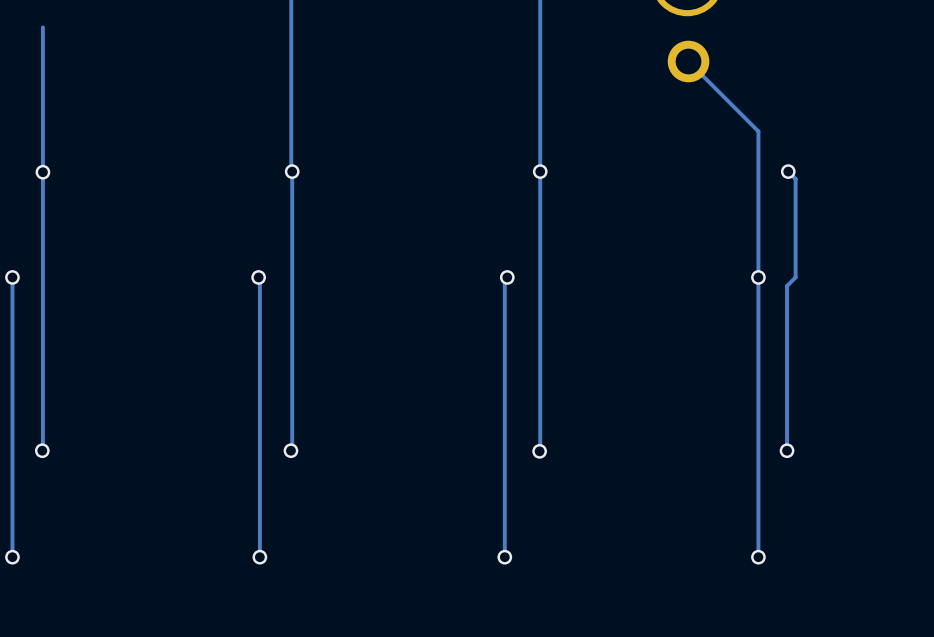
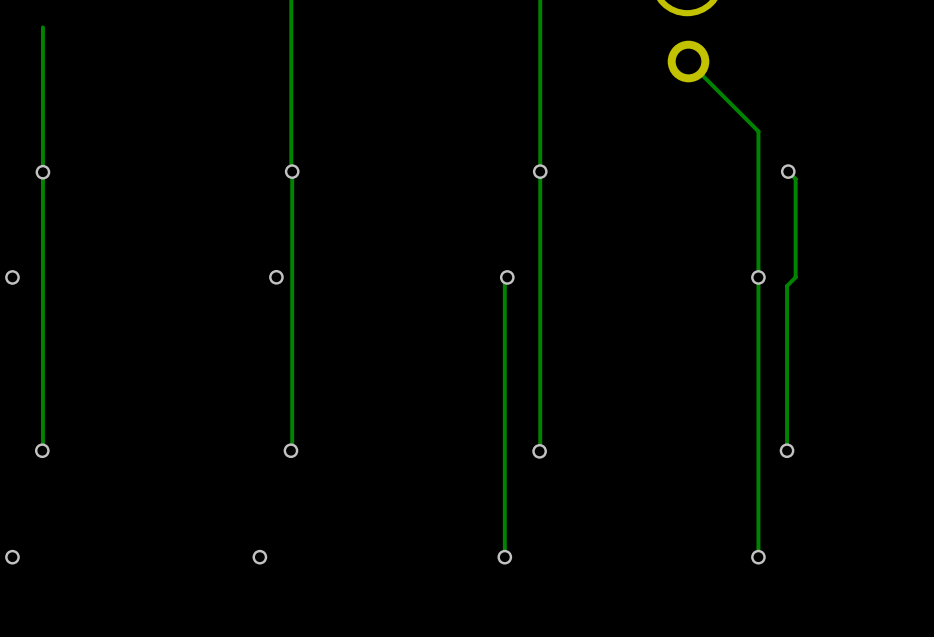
track: (12, 277) (12, 557) -> none
track: (258, 277) (259, 557) -> none
via position: (258, 277) -> (276, 277)

